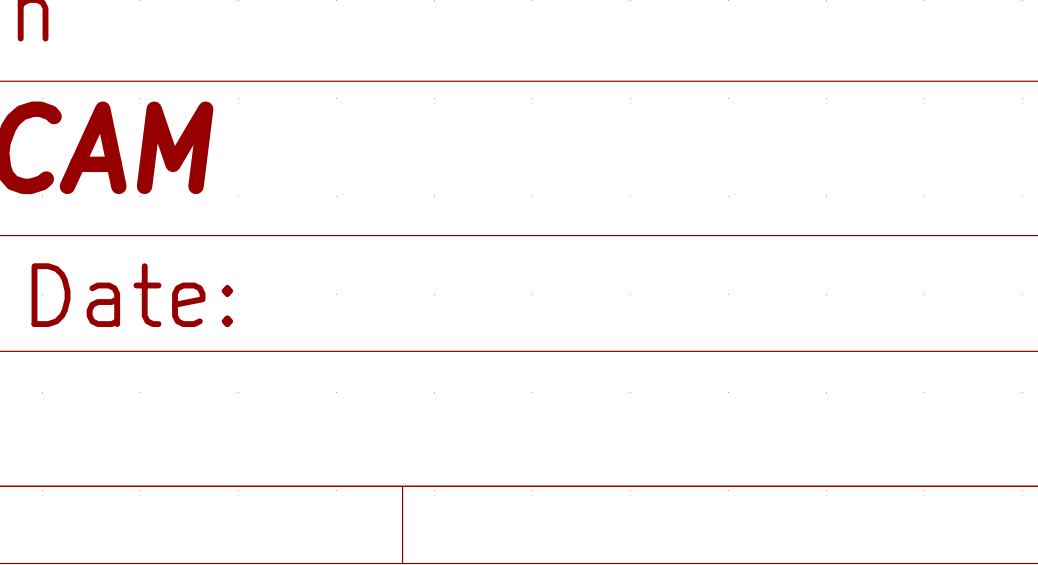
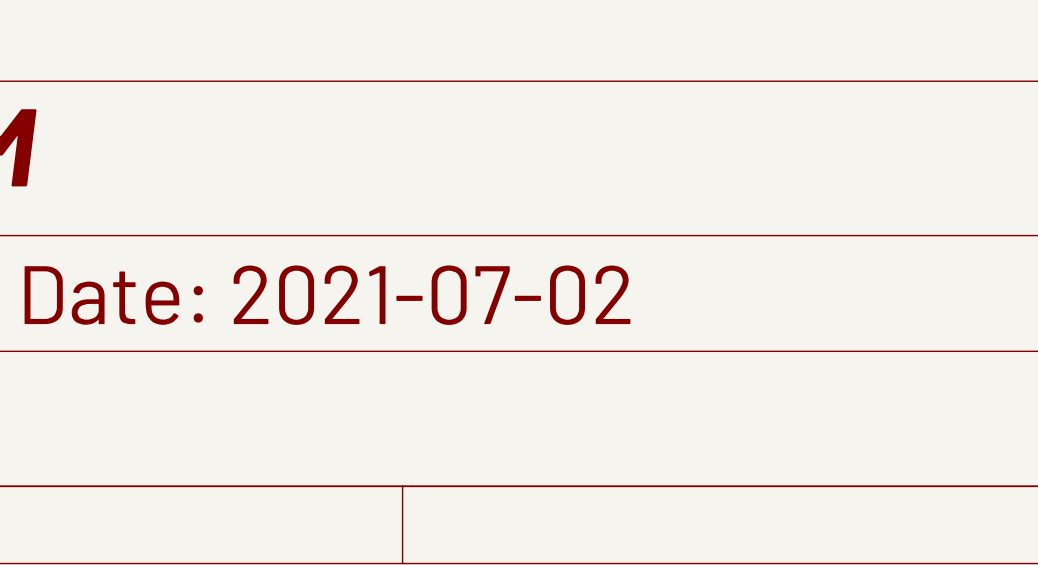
title block: Date: (132, 295) -> Date: 2021-07-02 (327, 295)

